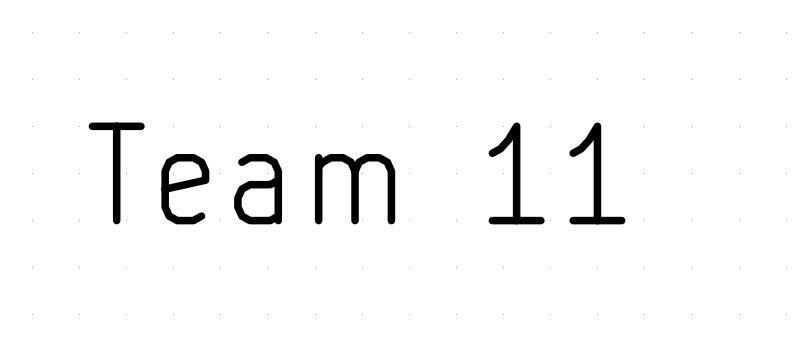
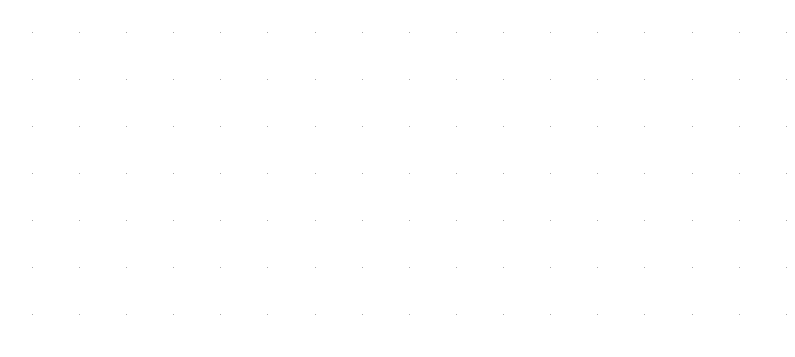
text: Team 11 (357, 173) -> none

